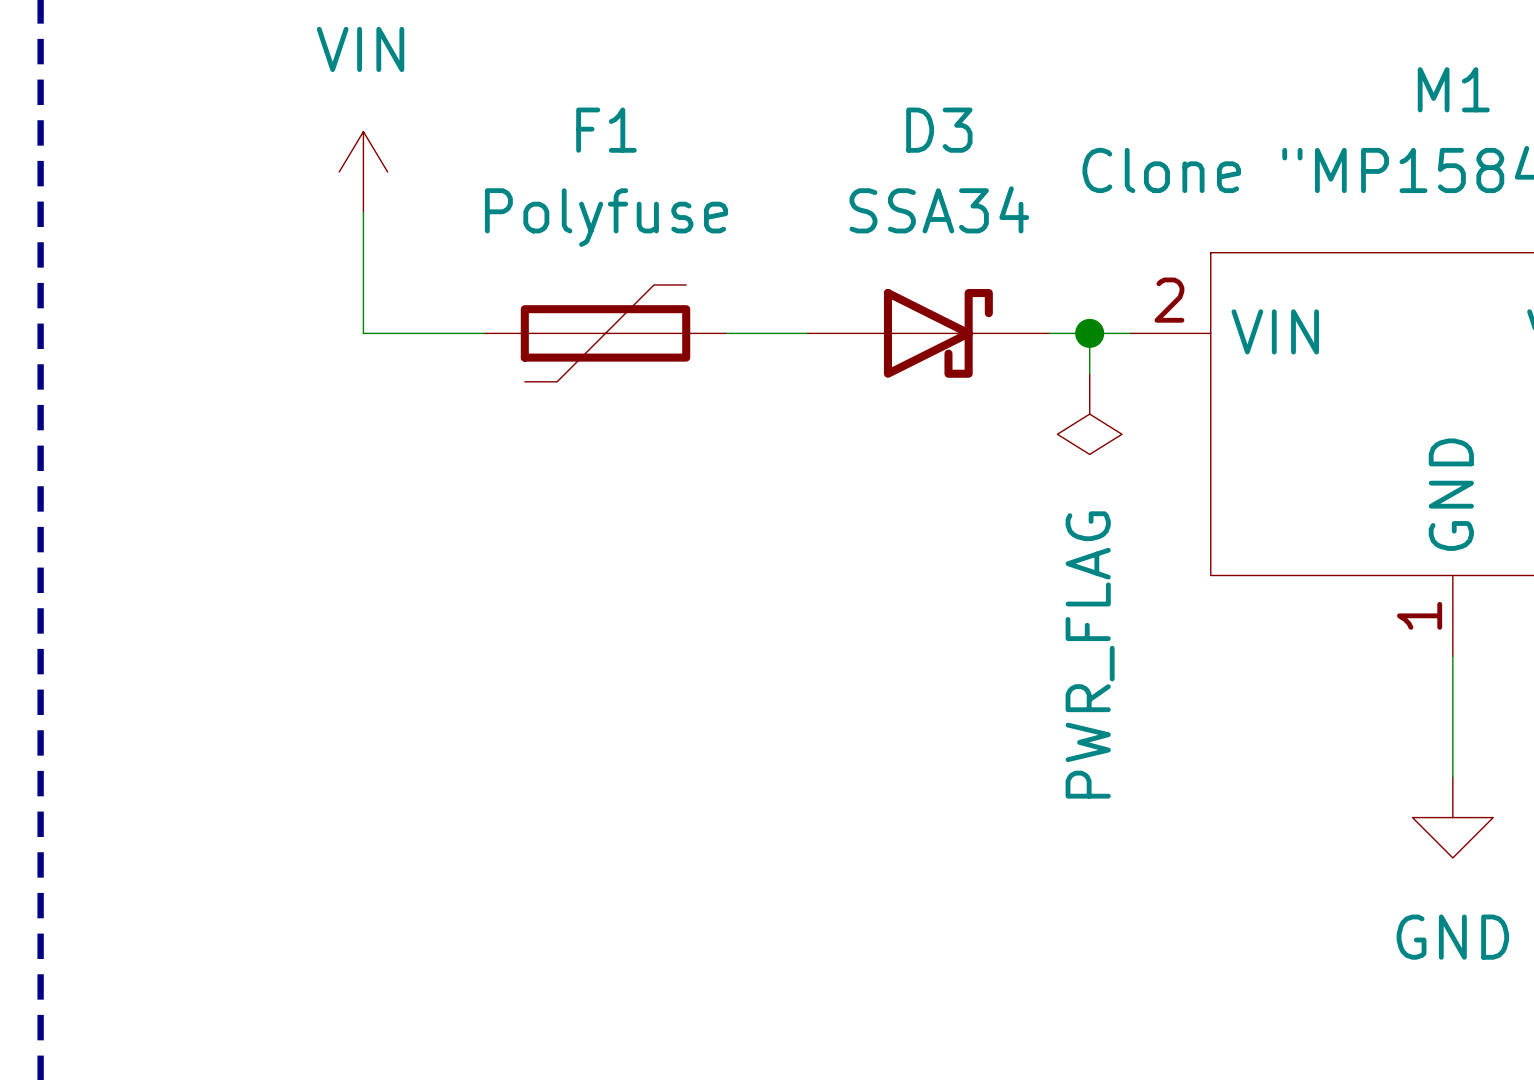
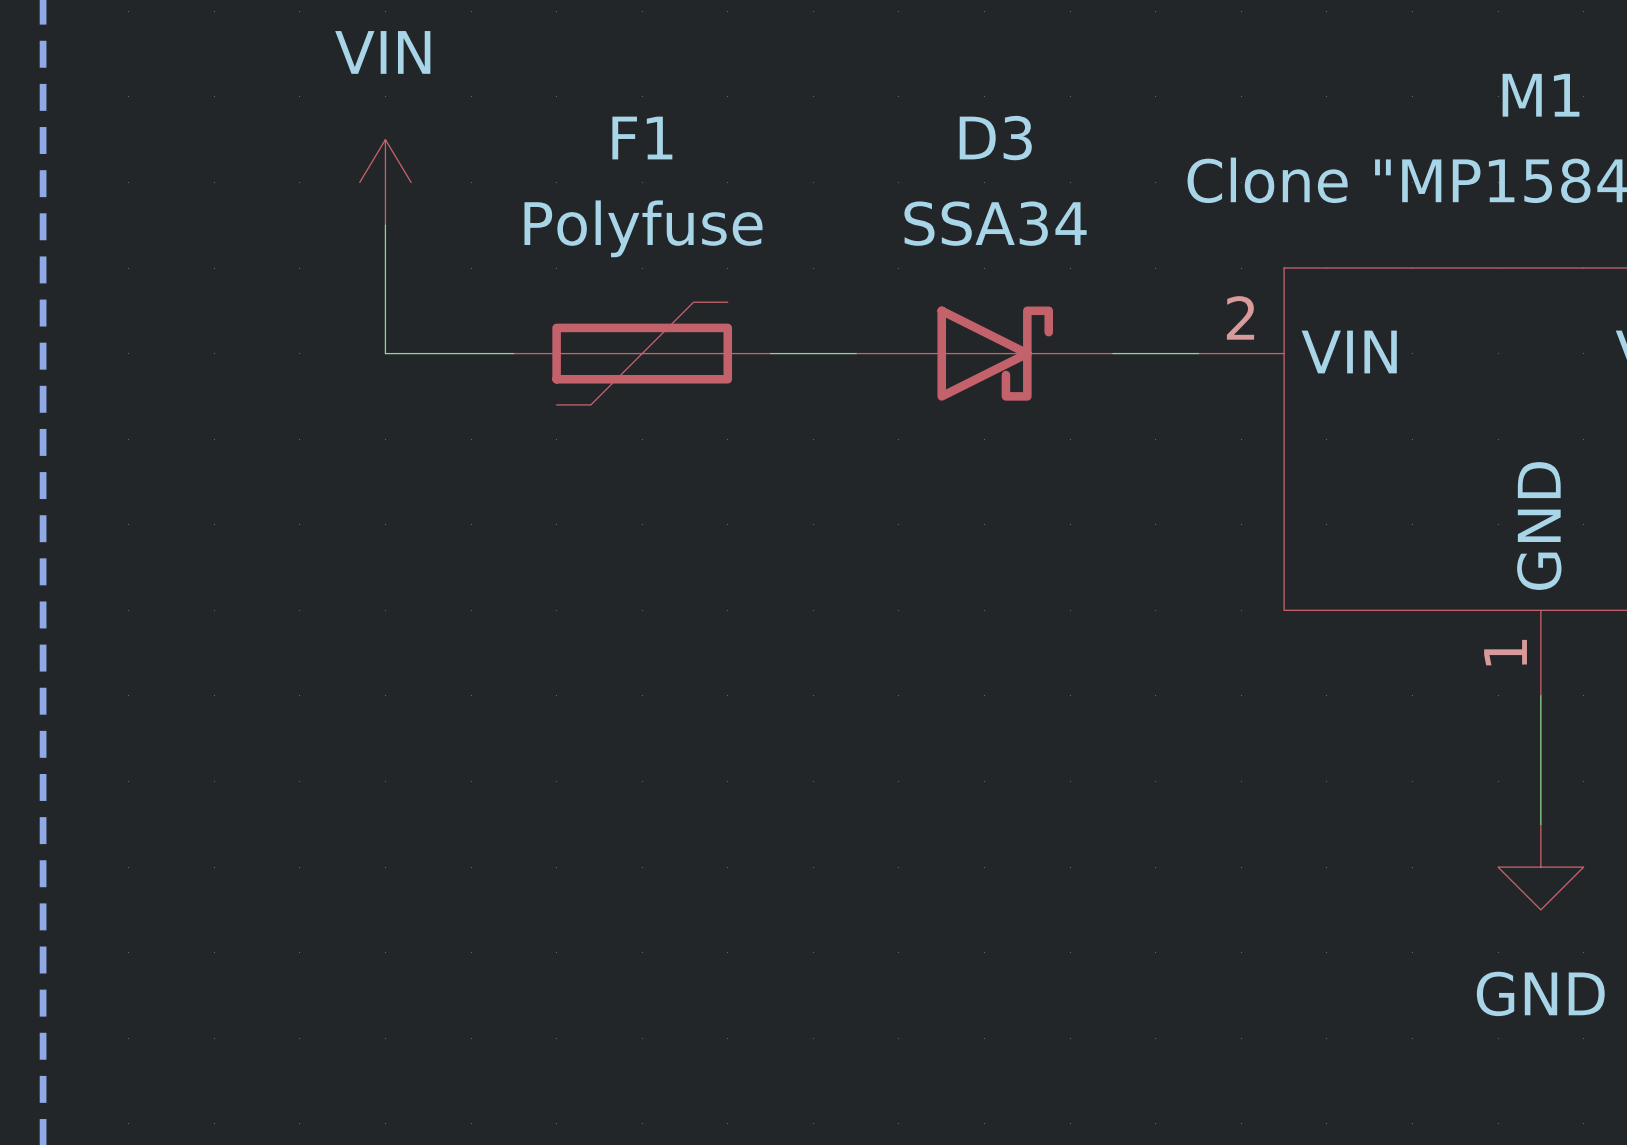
wire: (1089, 333) (1089, 373) -> none
junction: (1089, 333) -> none
power symbol: PWR_FLAG (1089, 414) -> none

